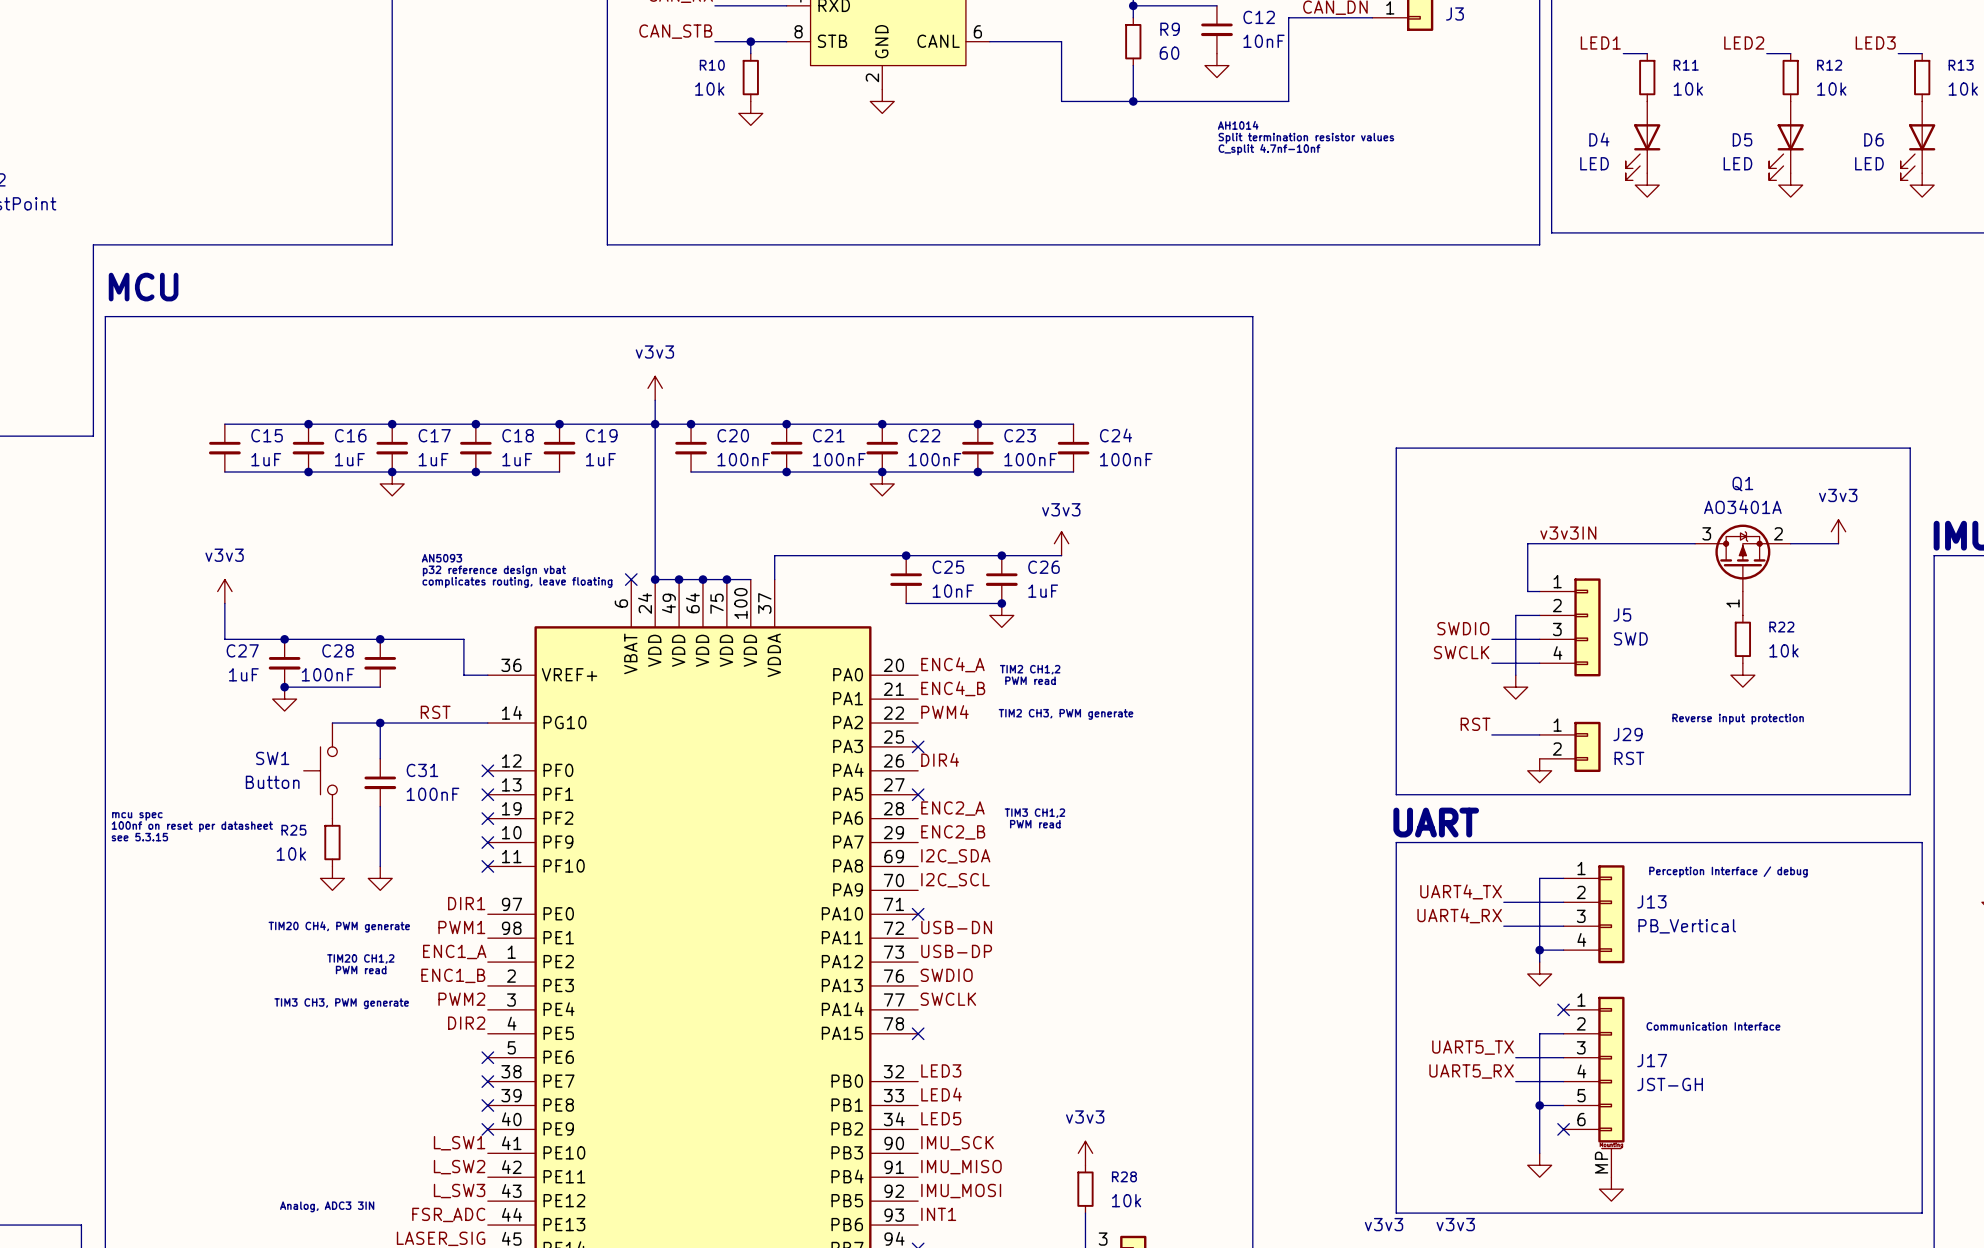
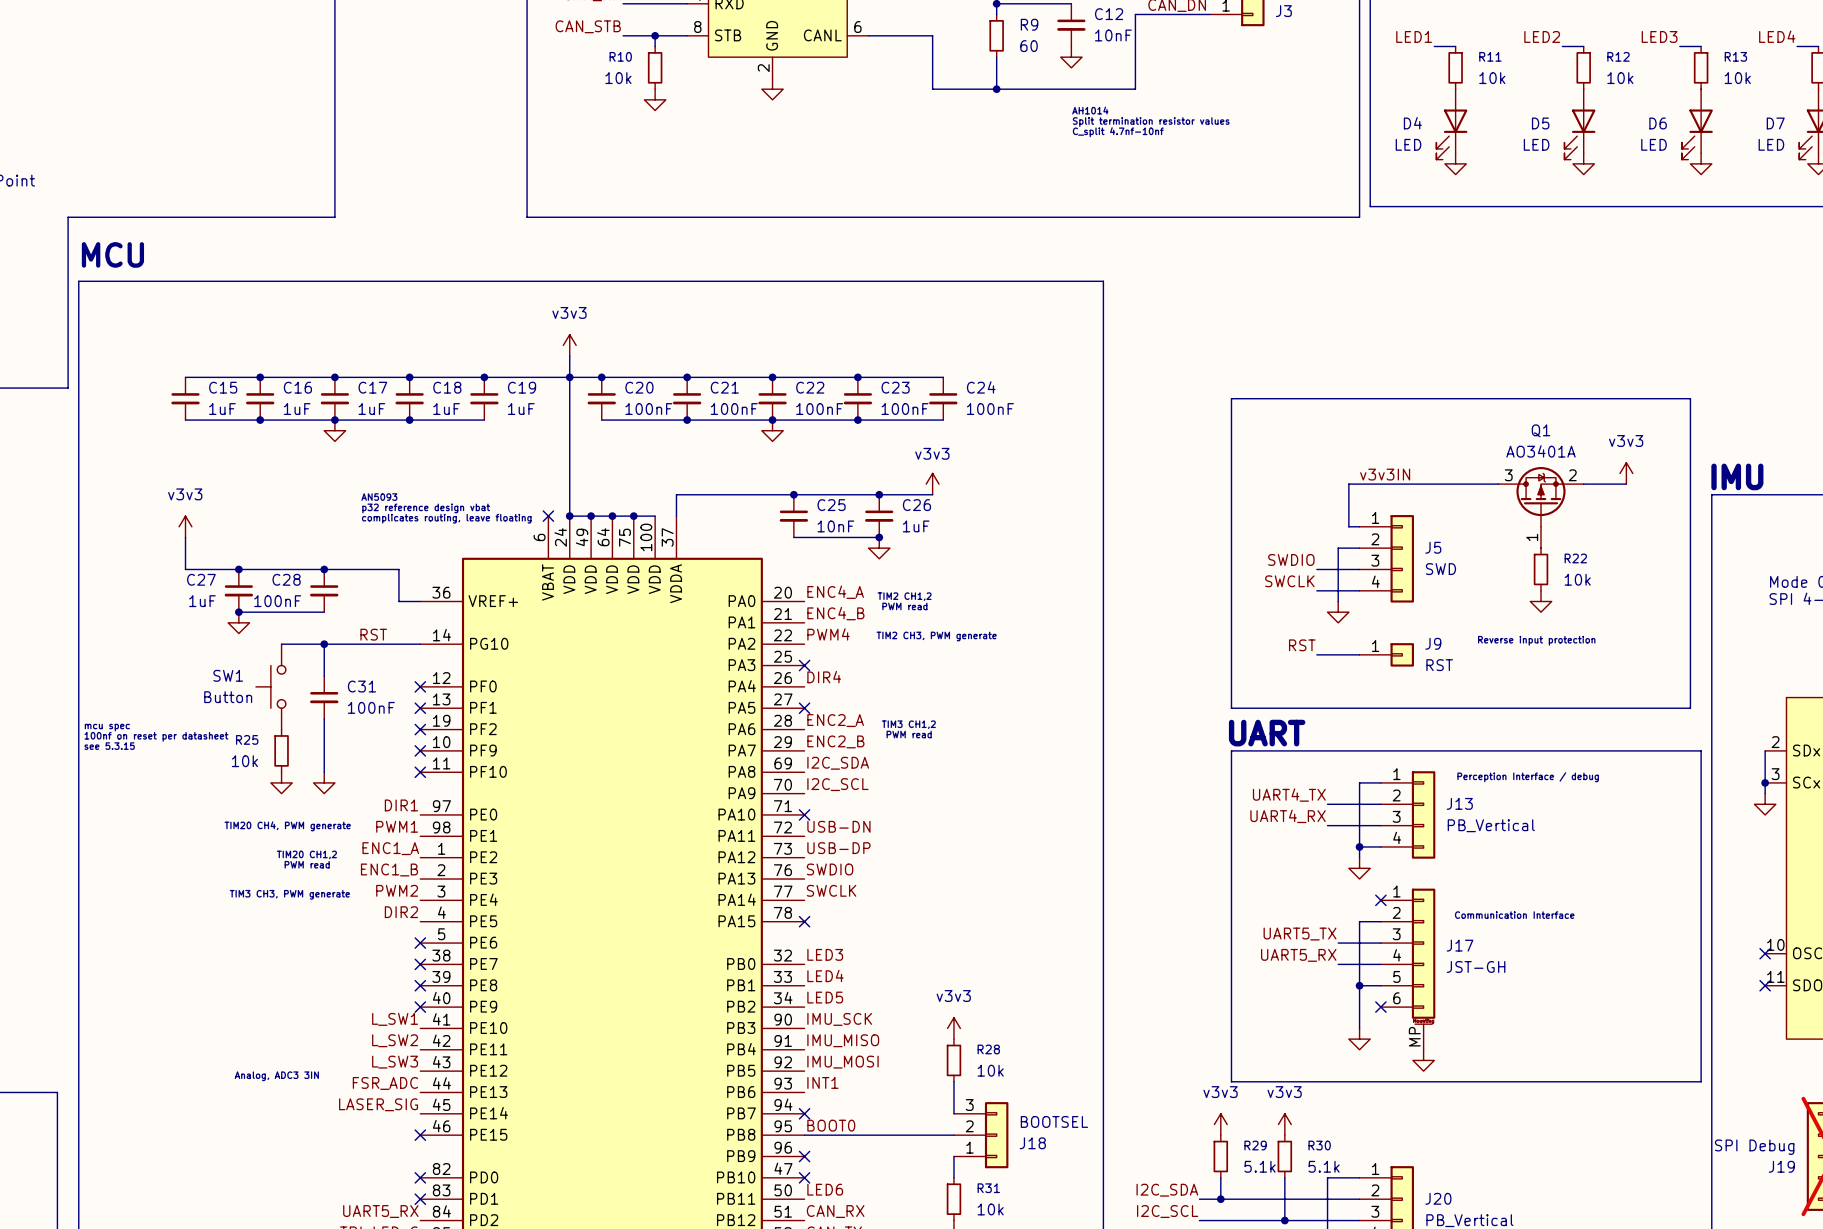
J9: none -> RST (1386, 654)
J29: RST (1570, 746) -> none
power symbol: (1539, 770) -> none

